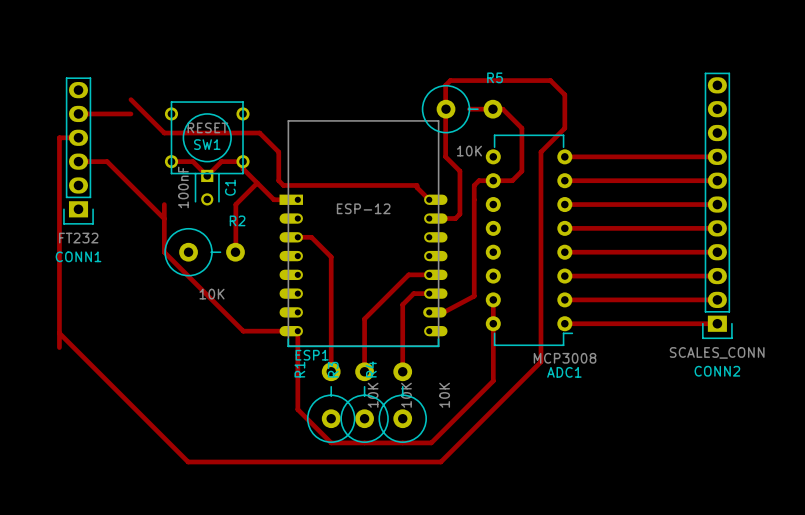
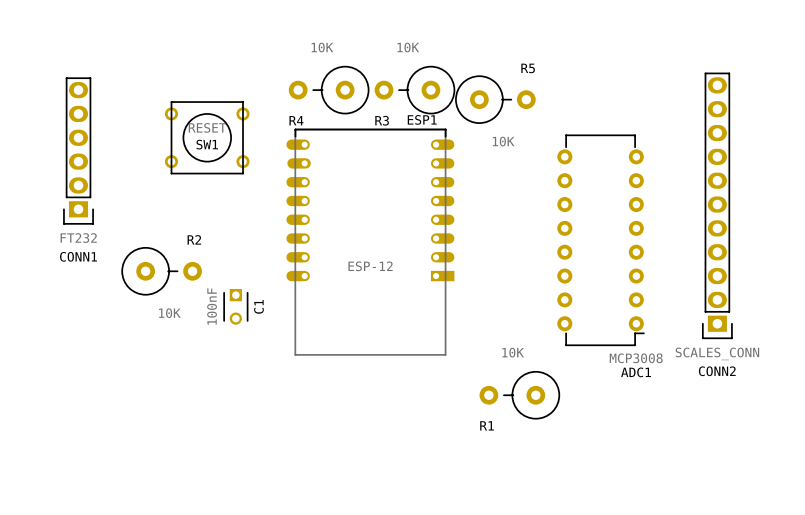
top track: (130, 99) (164, 133) (259, 133) (278, 152) (278, 180) (283, 185) (417, 185) (429, 199) -> none
R5 position: (462, 109) -> (495, 99)
top track: (469, 109) (502, 109) (521, 128) (521, 171) (512, 180) (479, 180) (474, 185) (474, 296) (443, 312) (429, 312) -> none
top track: (78, 113) (130, 113) -> none
top track: (78, 137) (59, 137) (59, 347) -> none
top track: (564, 156) (717, 156) -> none
top track: (78, 161) (107, 161) (164, 218) -> none
top track: (171, 161) (192, 161) (207, 175) (221, 161) (243, 161) (243, 168) (273, 199) (297, 199) -> none
top track: (564, 180) (717, 180) -> none
top track: (257, 183) (235, 204) (235, 252) -> none
C1 position: (207, 187) -> (235, 306)
top track: (164, 204) (164, 252) (243, 331) (297, 331) (297, 409) (331, 442) (431, 442) (493, 380) (493, 299) -> none
top track: (564, 204) (717, 204) -> none
top track: (429, 218) (455, 218) (459, 214) (459, 171) (445, 156) (445, 85) (450, 80) (550, 80) (564, 94) (564, 128) (540, 152) (540, 361) (440, 462) (188, 462) (59, 333) -> none
top track: (564, 228) (717, 228) -> none
ESP1 rotation: 0° (363, 233) -> 180° (370, 241)
top track: (297, 237) (311, 237) (331, 256) (331, 371) -> none
ADC1 position: (529, 240) -> (600, 240)
R2 position: (204, 252) -> (161, 271)
top track: (564, 252) (717, 252) -> none
top track: (429, 274) (408, 274) (364, 318) (364, 371) -> none
top track: (564, 276) (717, 276) -> none
top track: (429, 293) (413, 293) (402, 304) (402, 371) -> none
top track: (564, 299) (717, 299) -> none
top track: (564, 323) (717, 323) -> none
R1 rotation: 0° (331, 402) -> 90° counterclockwise (519, 395)
R1 position: (331, 402) -> (519, 395)
R3 rotation: 0° (364, 402) -> 90° counterclockwise (414, 90)
R3 position: (364, 402) -> (414, 90)
R4 rotation: 0° (402, 402) -> 90° counterclockwise (329, 90)
R4 position: (402, 402) -> (329, 90)

